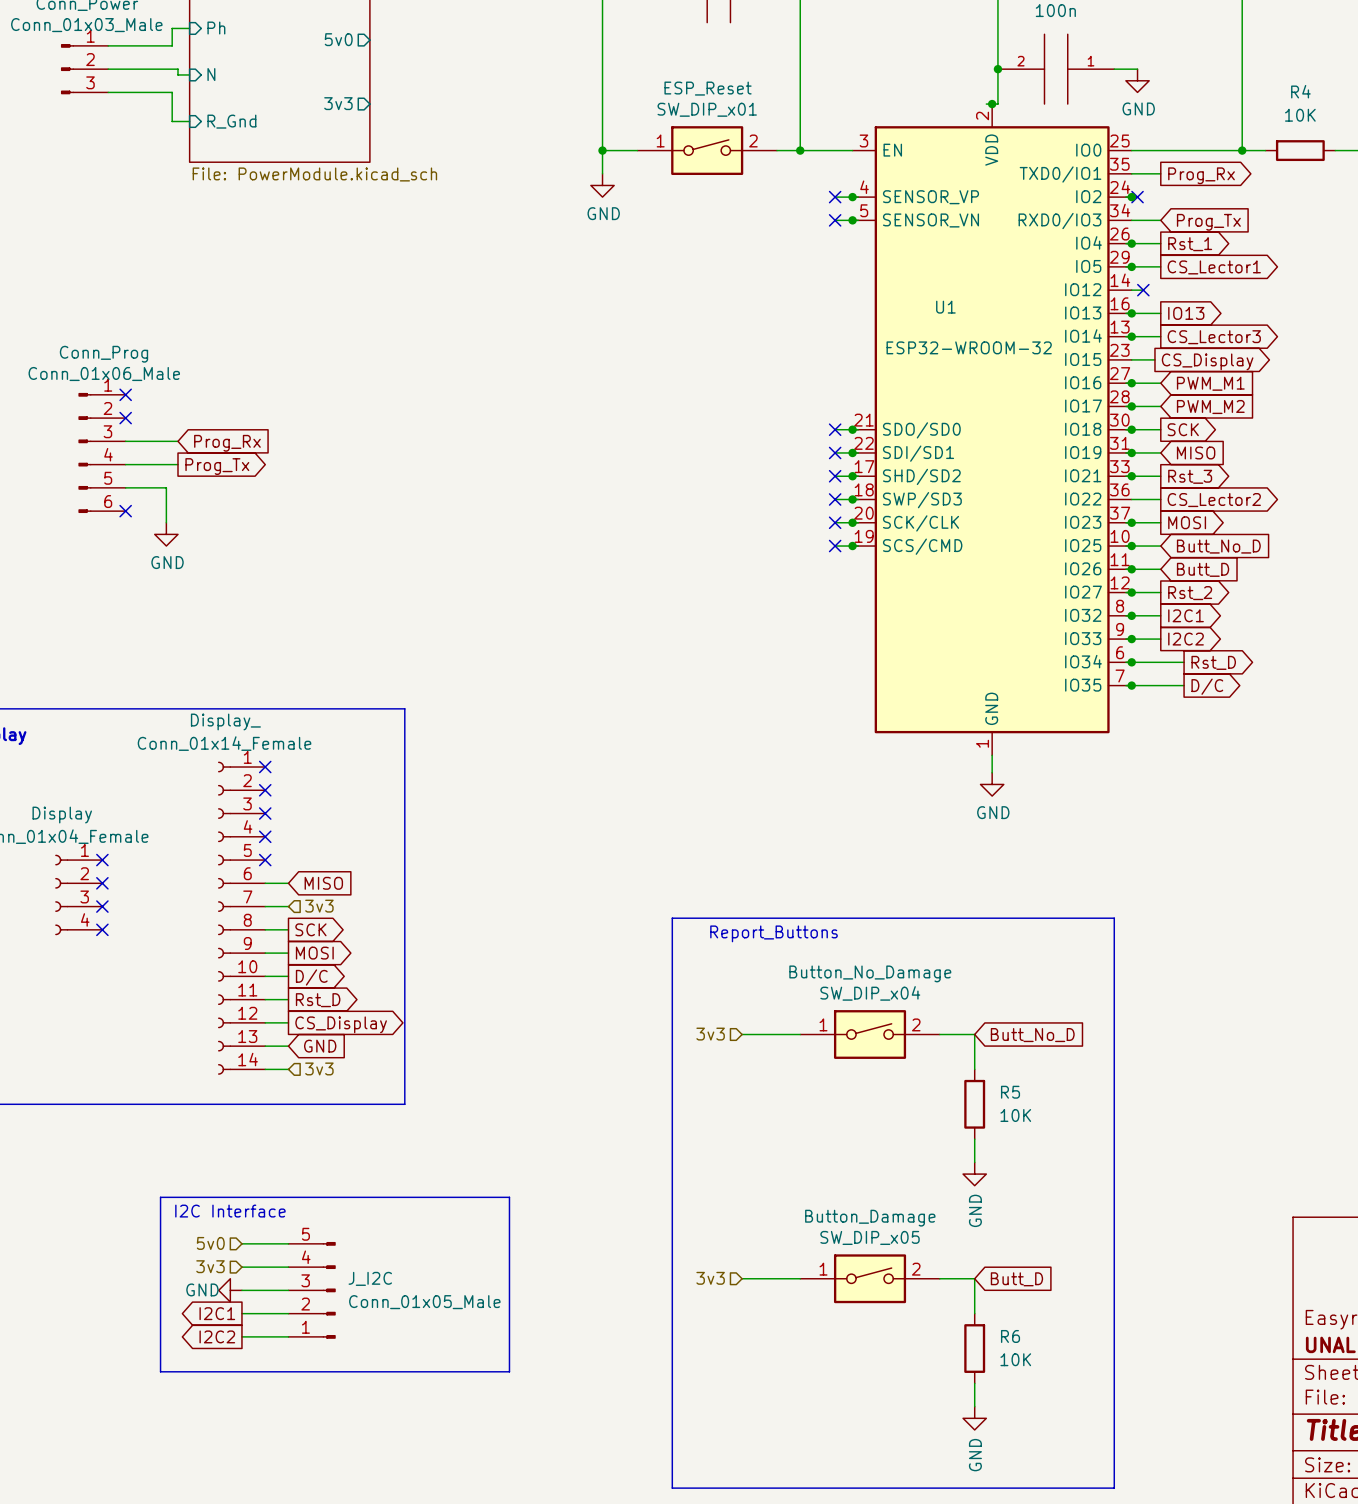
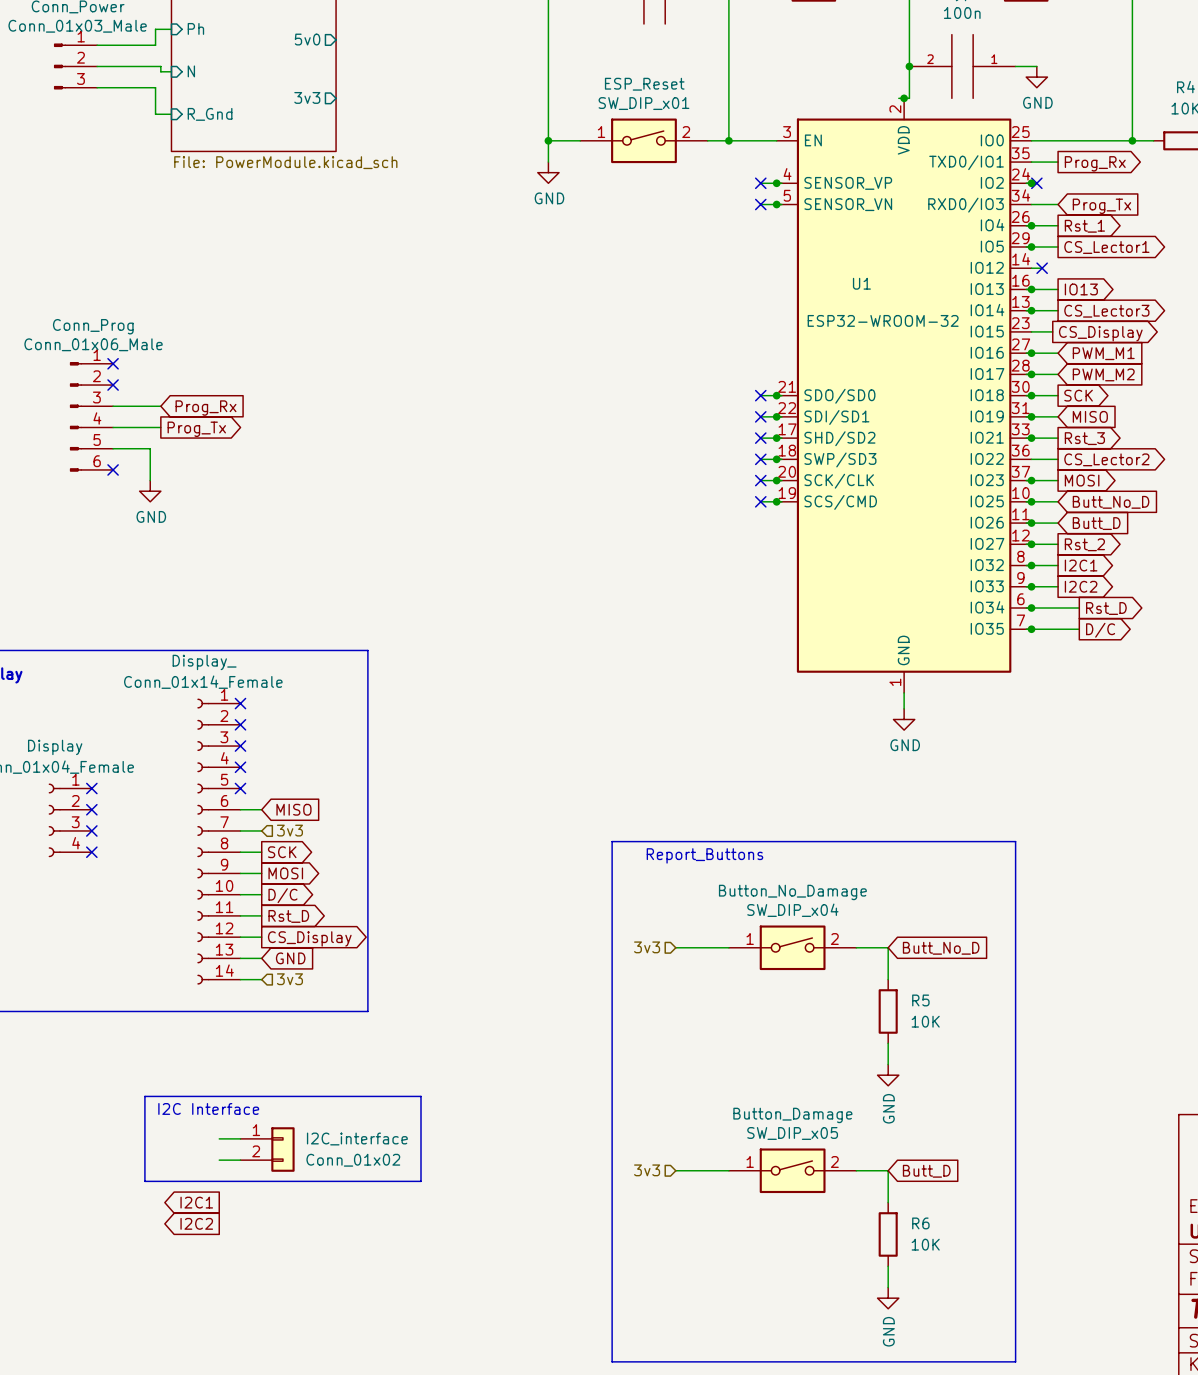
line: (462, 1197) (509, 1197) (509, 1371) (160, 1371) (160, 1290) -> (420, 1096) (420, 1181) (144, 1181)
hierarchical label: 5v0 (210, 1243) -> none
I2C_interface: none -> Conn_01x02 (267, 1149)
hierarchical label: 3v3 (210, 1266) -> none
power symbol: GND (230, 1290) -> none
J_I2C: Conn_01x05_Male (312, 1290) -> none
wire: (241, 1313) (288, 1313) -> none
wire: (241, 1336) (288, 1336) -> none

